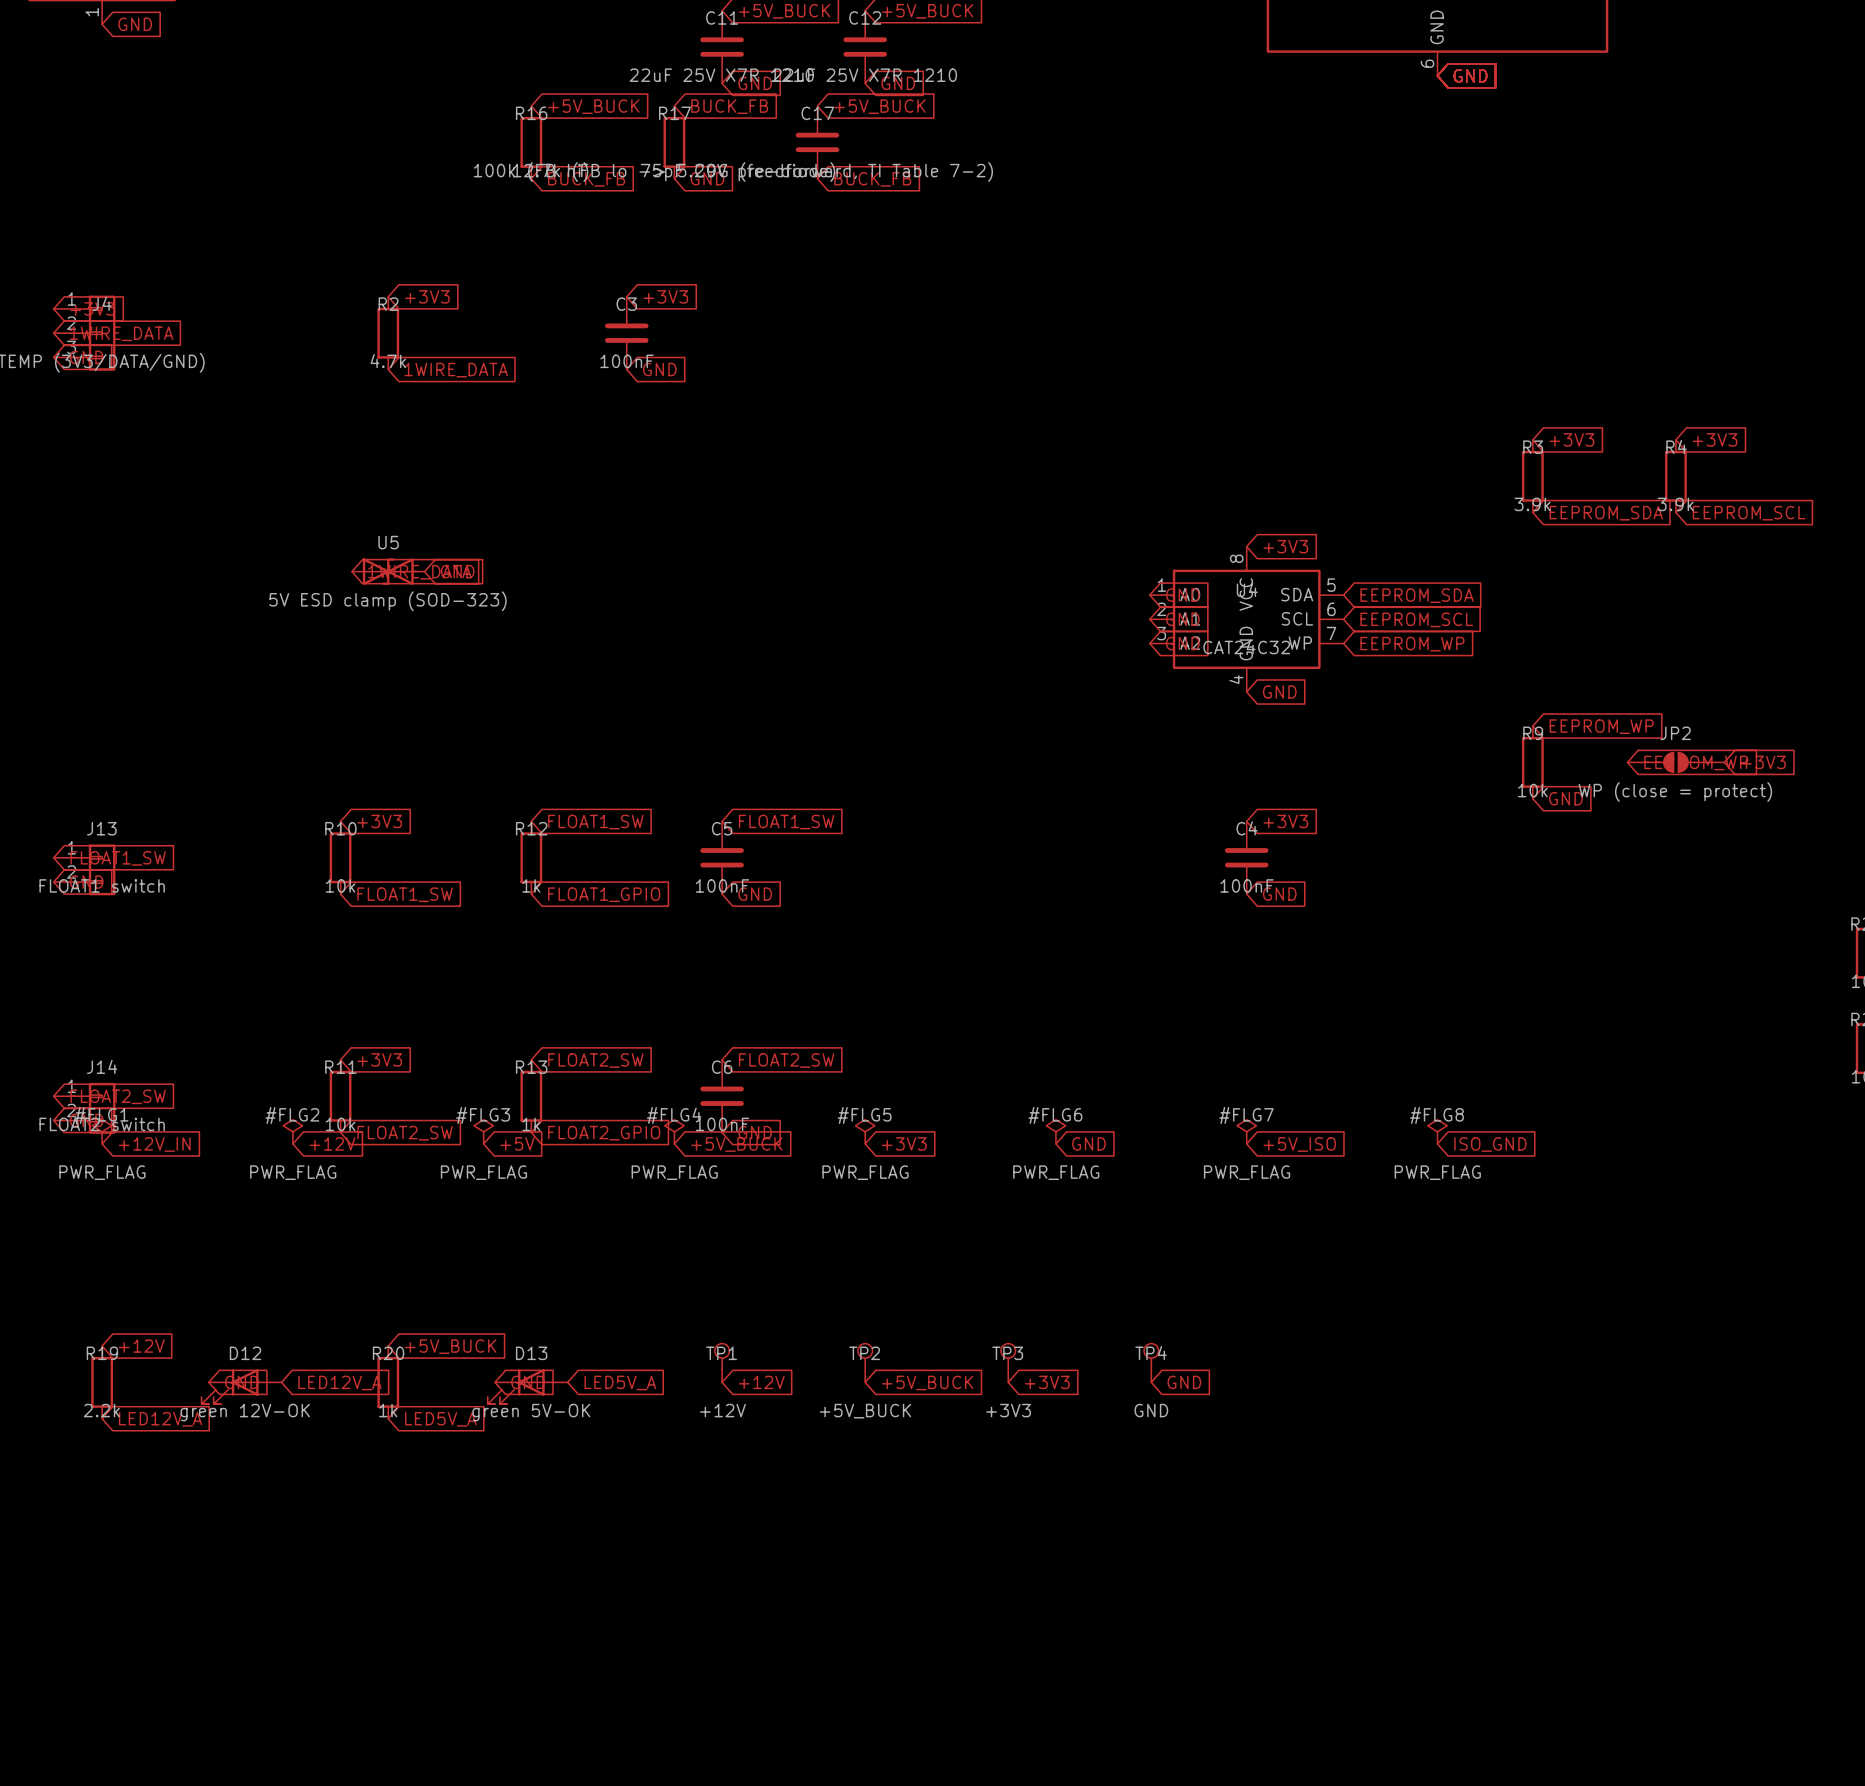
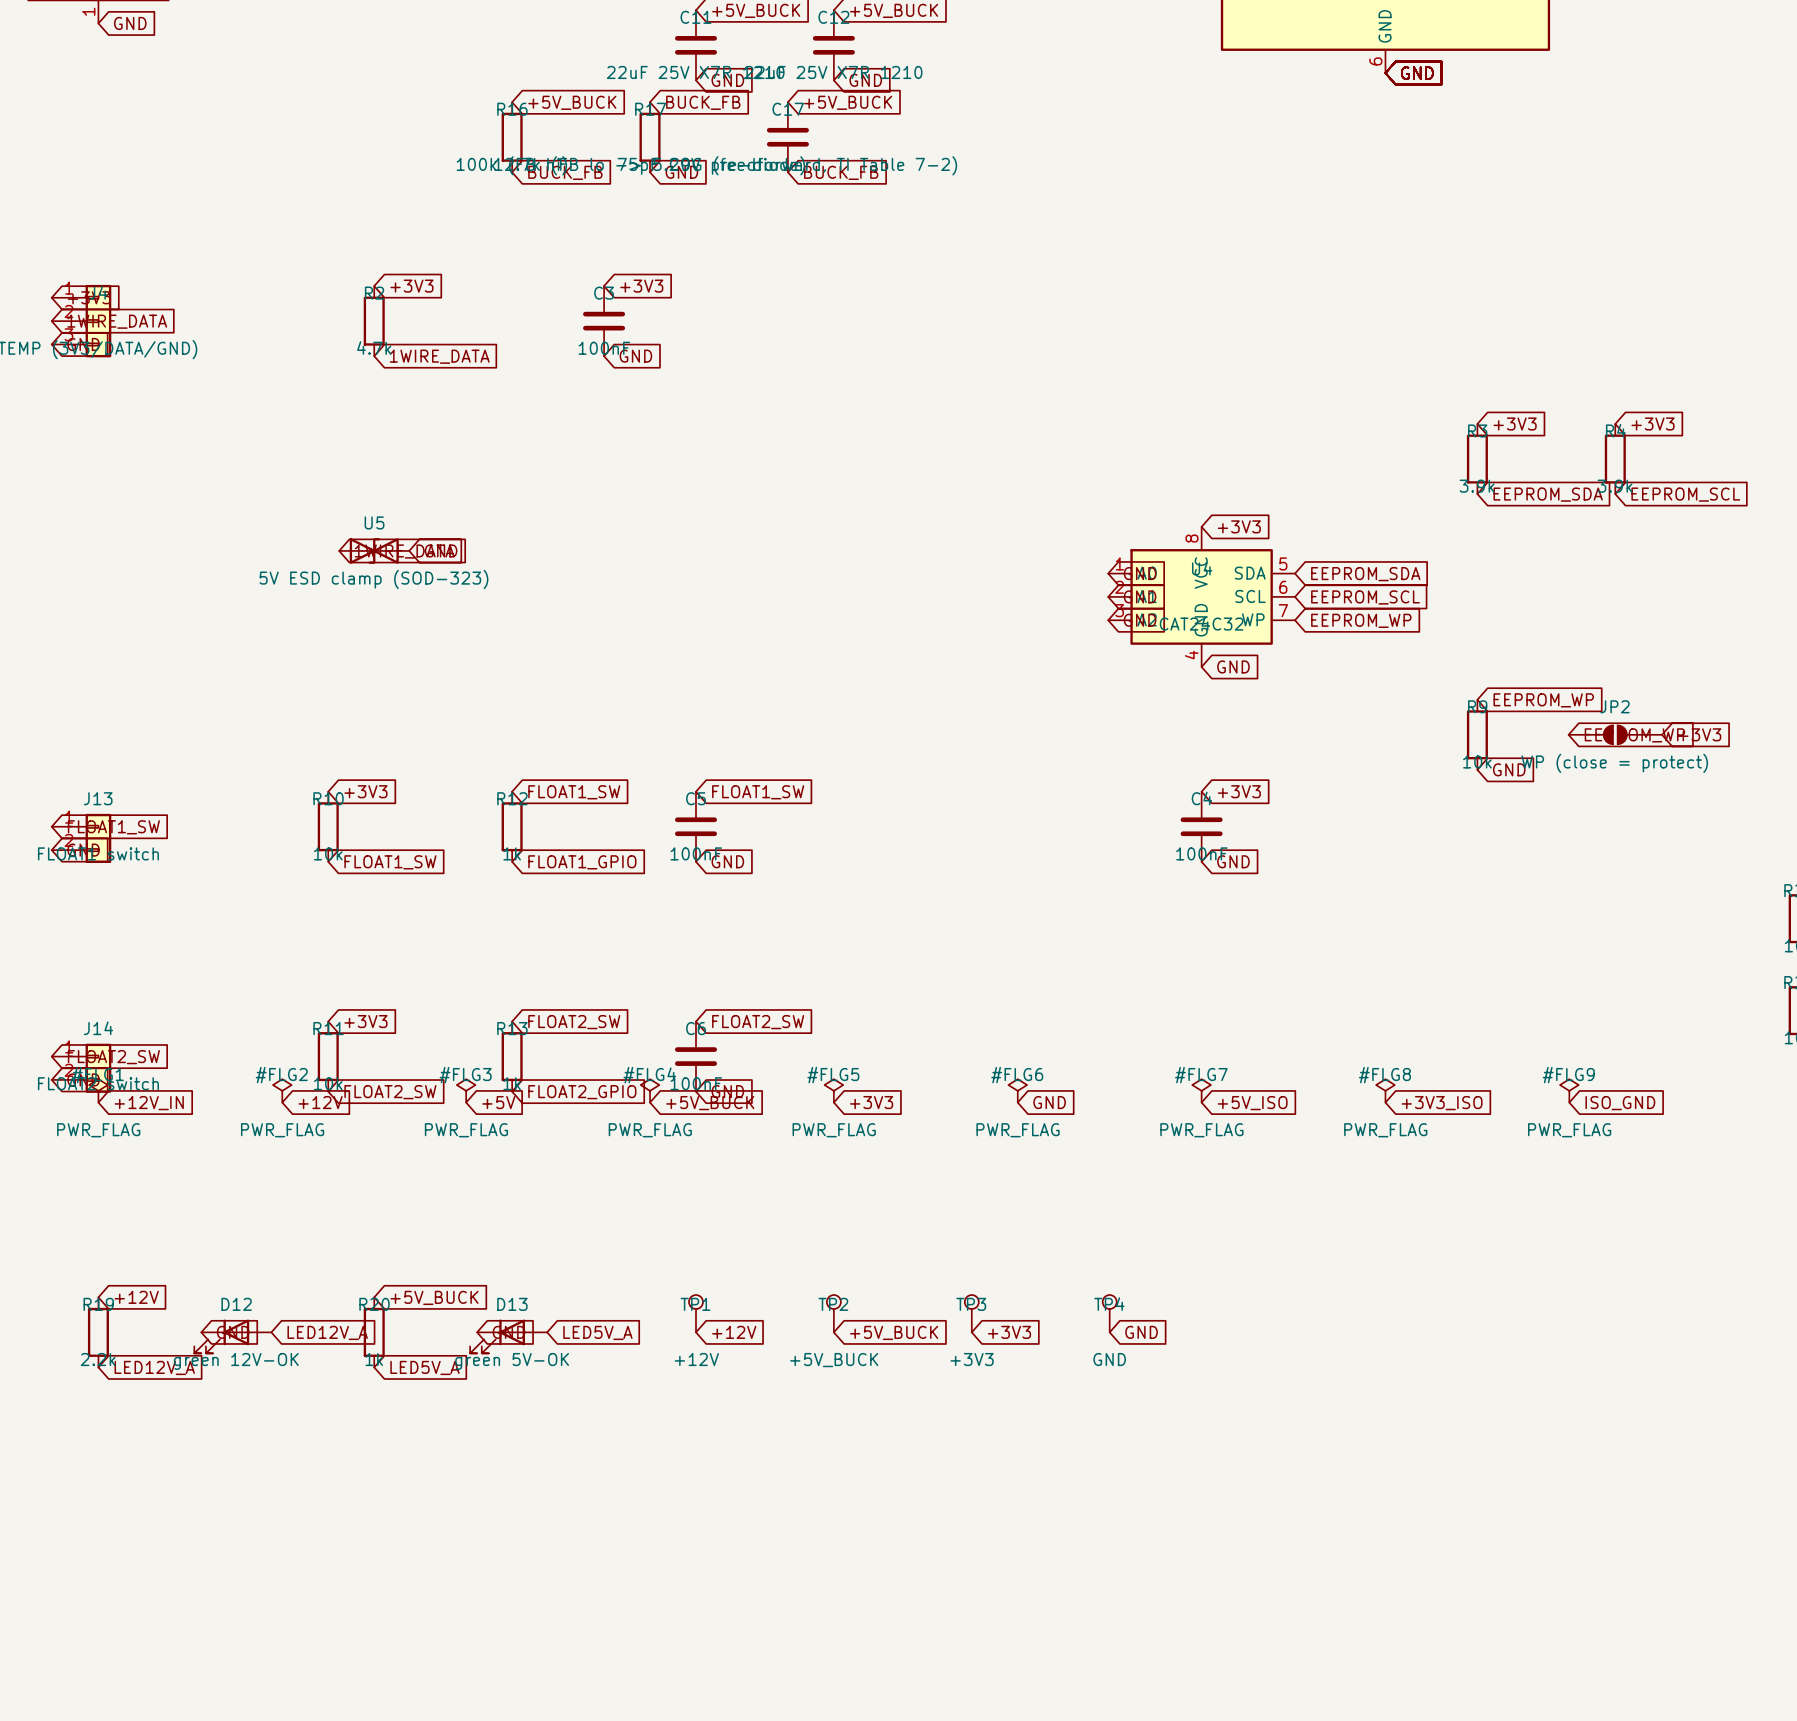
#FLG9: none -> PWR_FLAG (1569, 1090)
global label: ISO_GND (1490, 1144) -> +3V3_ISO (1442, 1103)
global label: none -> ISO_GND (1620, 1103)

